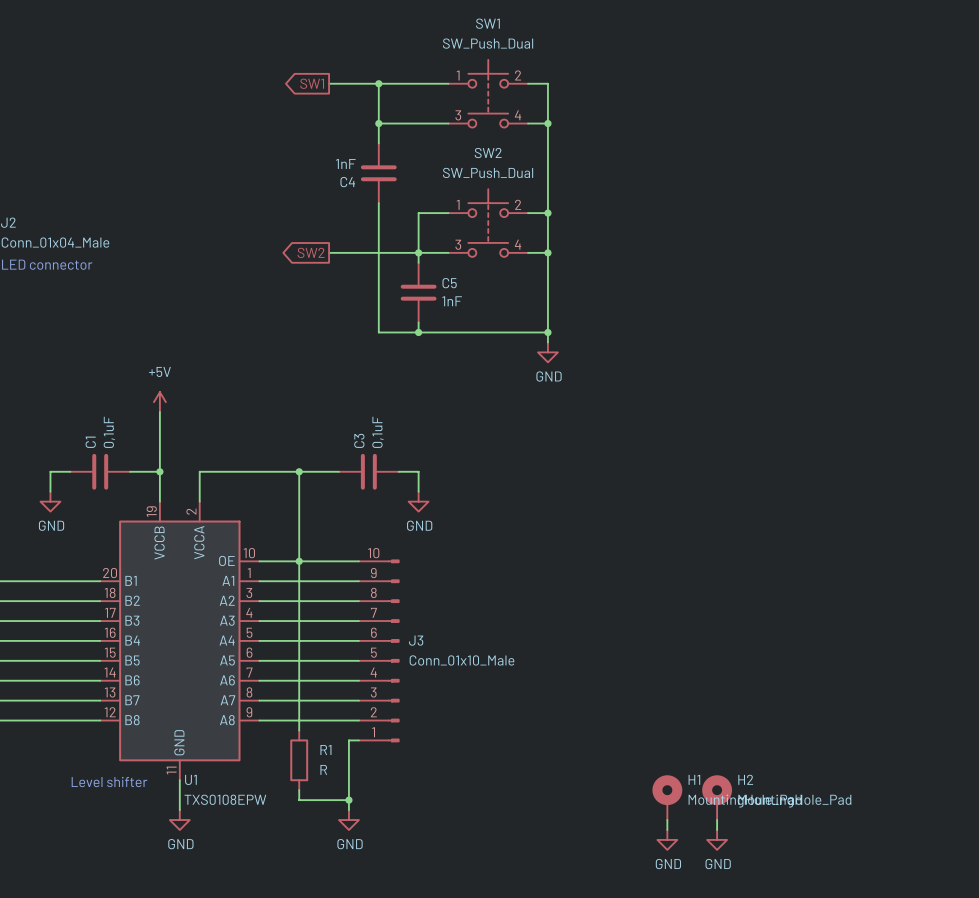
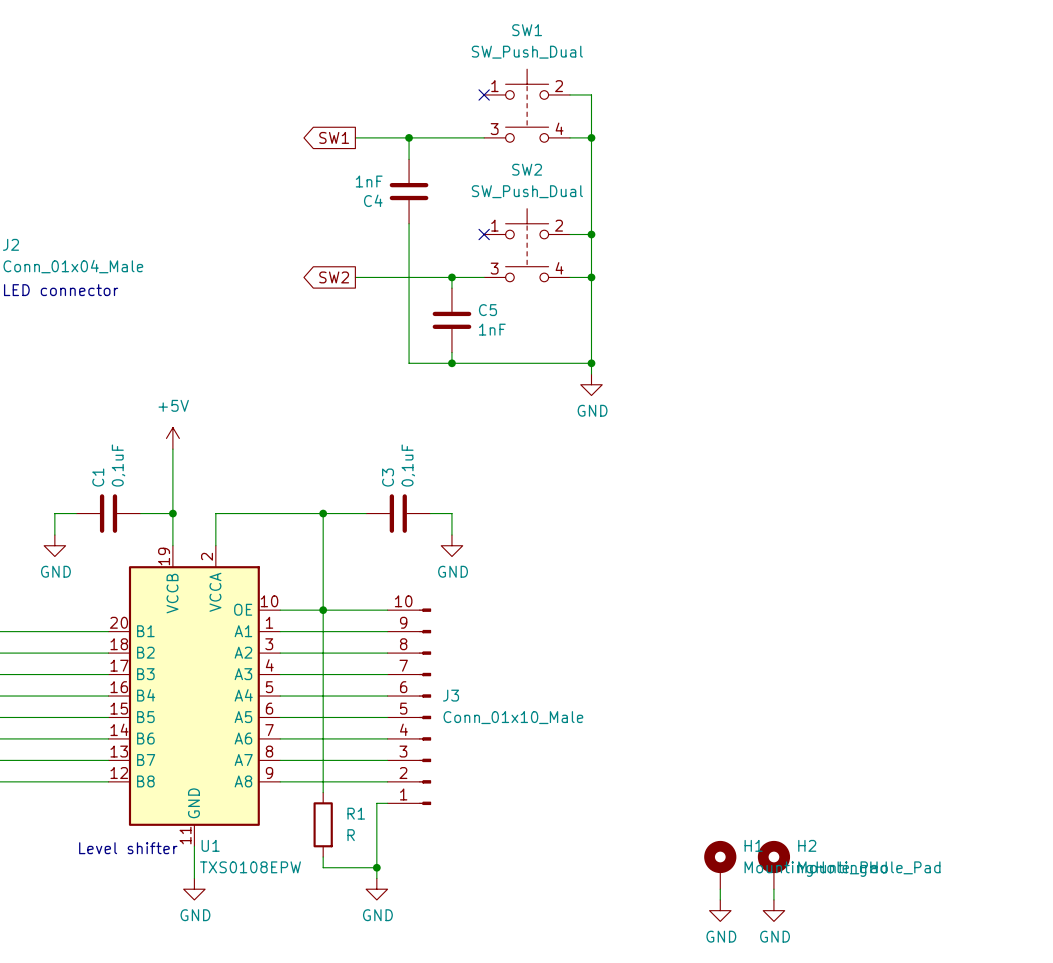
global label position: SW1 (312, 83) -> SW1 (334, 137)
wire: (329, 83) (448, 83) -> none
wire: (378, 83) (378, 123) -> (355, 137) (409, 137)
junction: (378, 83) -> none
no-connect mark: none -> (484, 94)
wire: (448, 213) (418, 213) (418, 252) -> none
no-connect mark: none -> (484, 234)

